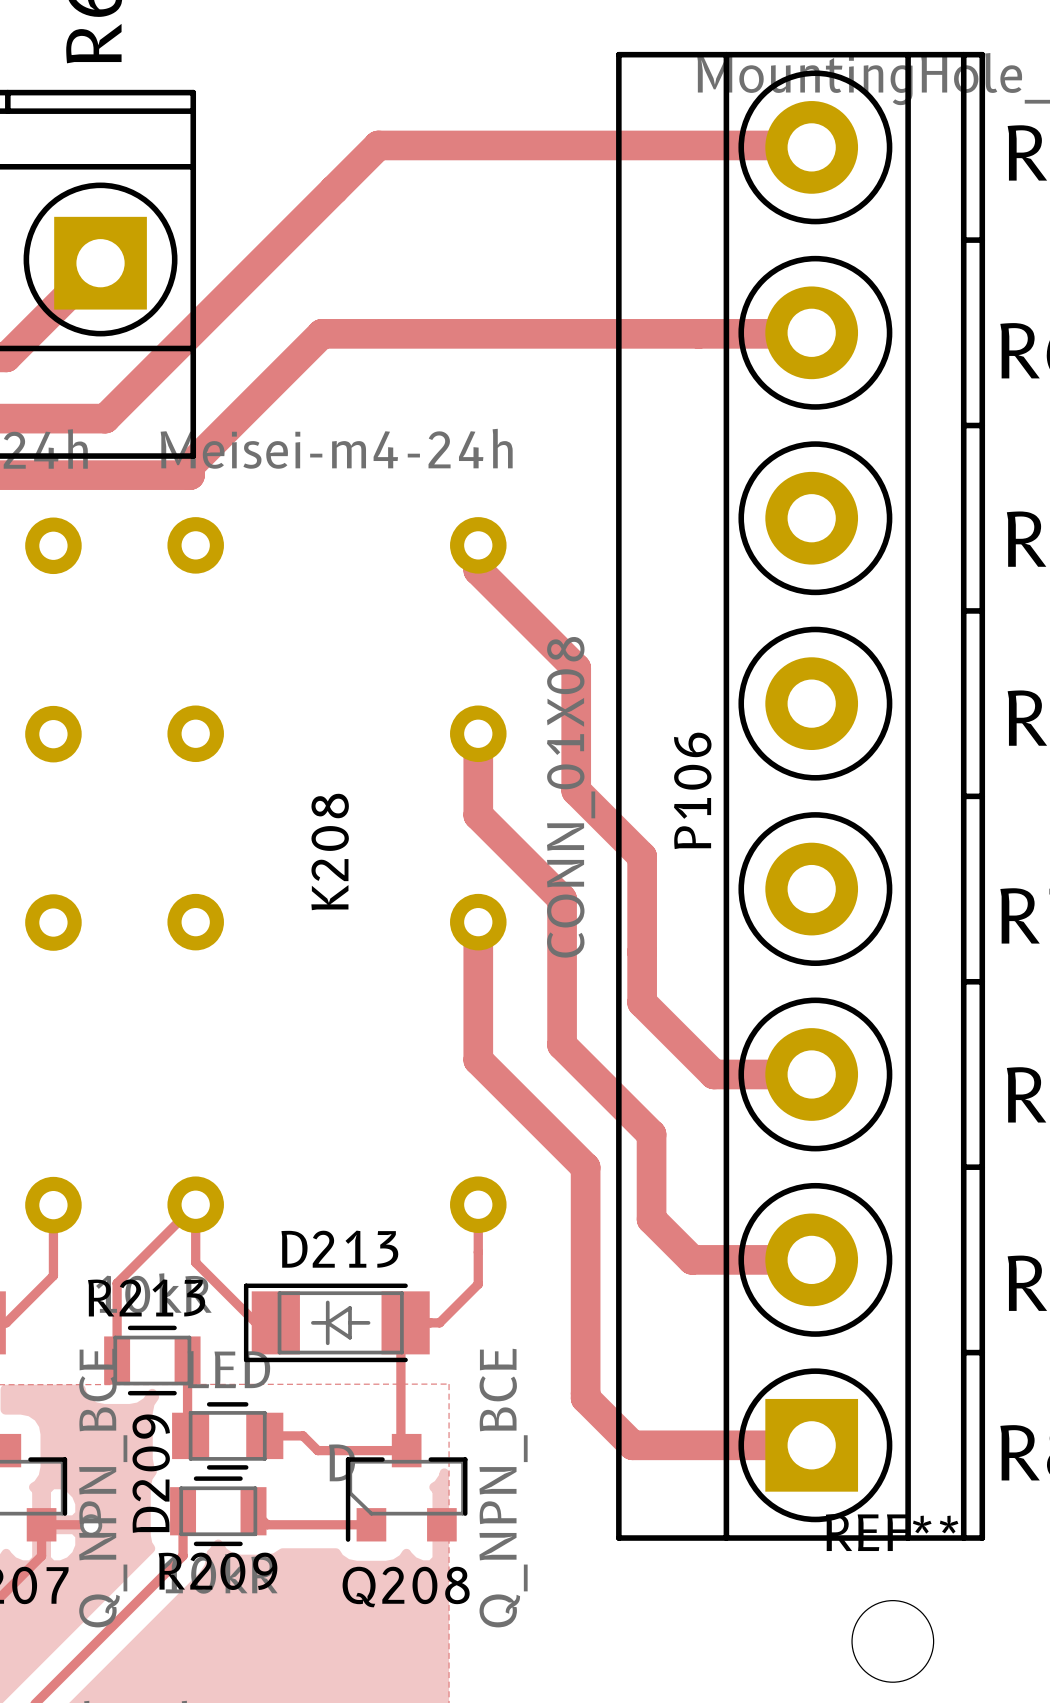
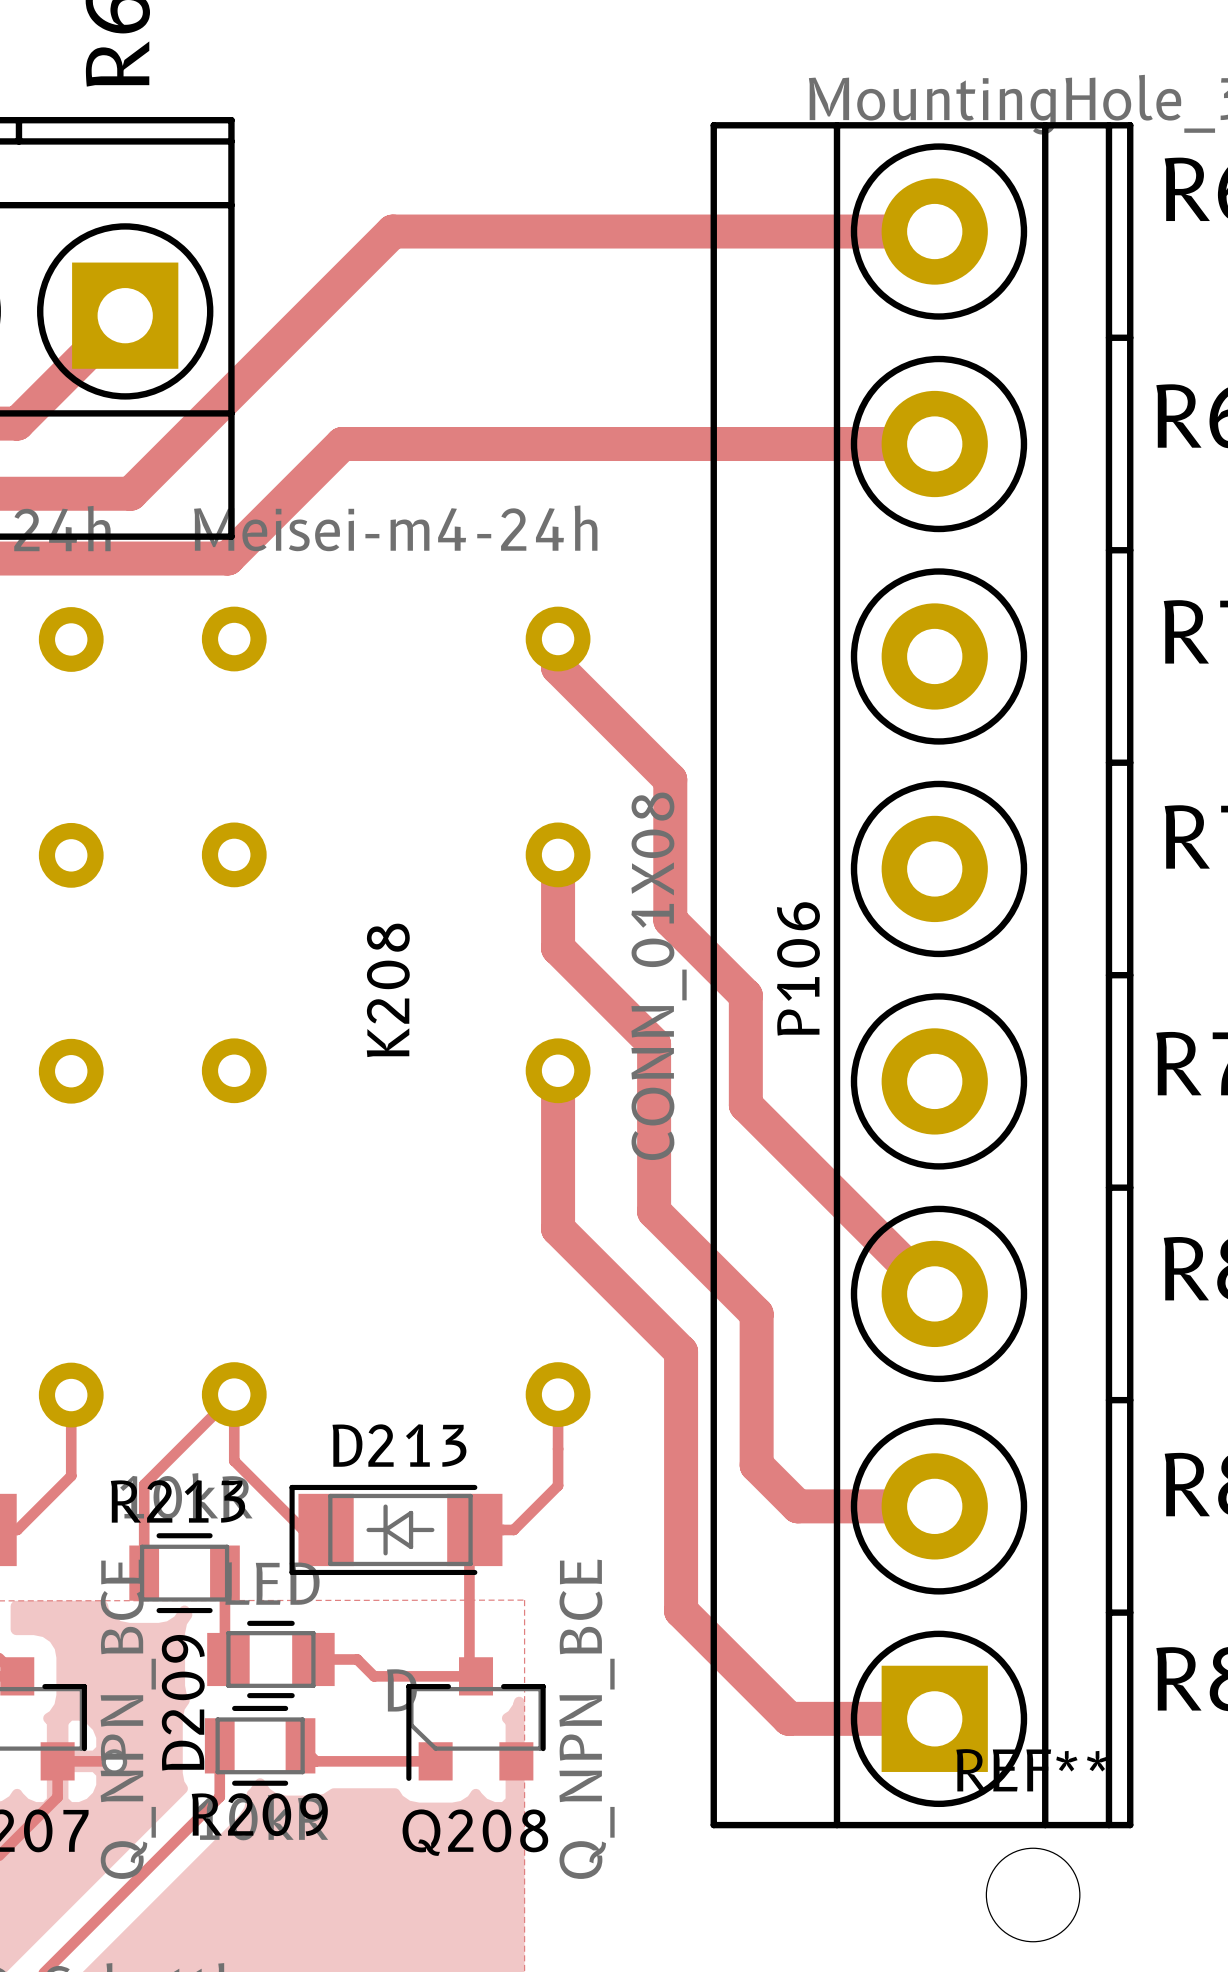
track: (811, 147) (809, 145) (378, 145) (334, 189) -> (934, 231) (392, 231)
track: (811, 332) (321, 333) (190, 465) (190, 475) -> (934, 444) (342, 444) (227, 558)
P106 position: (800, 796) -> (921, 975)
track: (642, 952) (642, 1002) (714, 1074) (811, 1074) -> (745, 1105) (934, 1293)
track: (651, 1219) (692, 1259) (811, 1259) -> (756, 1411) (756, 1465) (797, 1506) (934, 1506)
track: (585, 1393) (585, 1398) (632, 1445) (811, 1445) -> (681, 1610) (789, 1718) (934, 1718)

